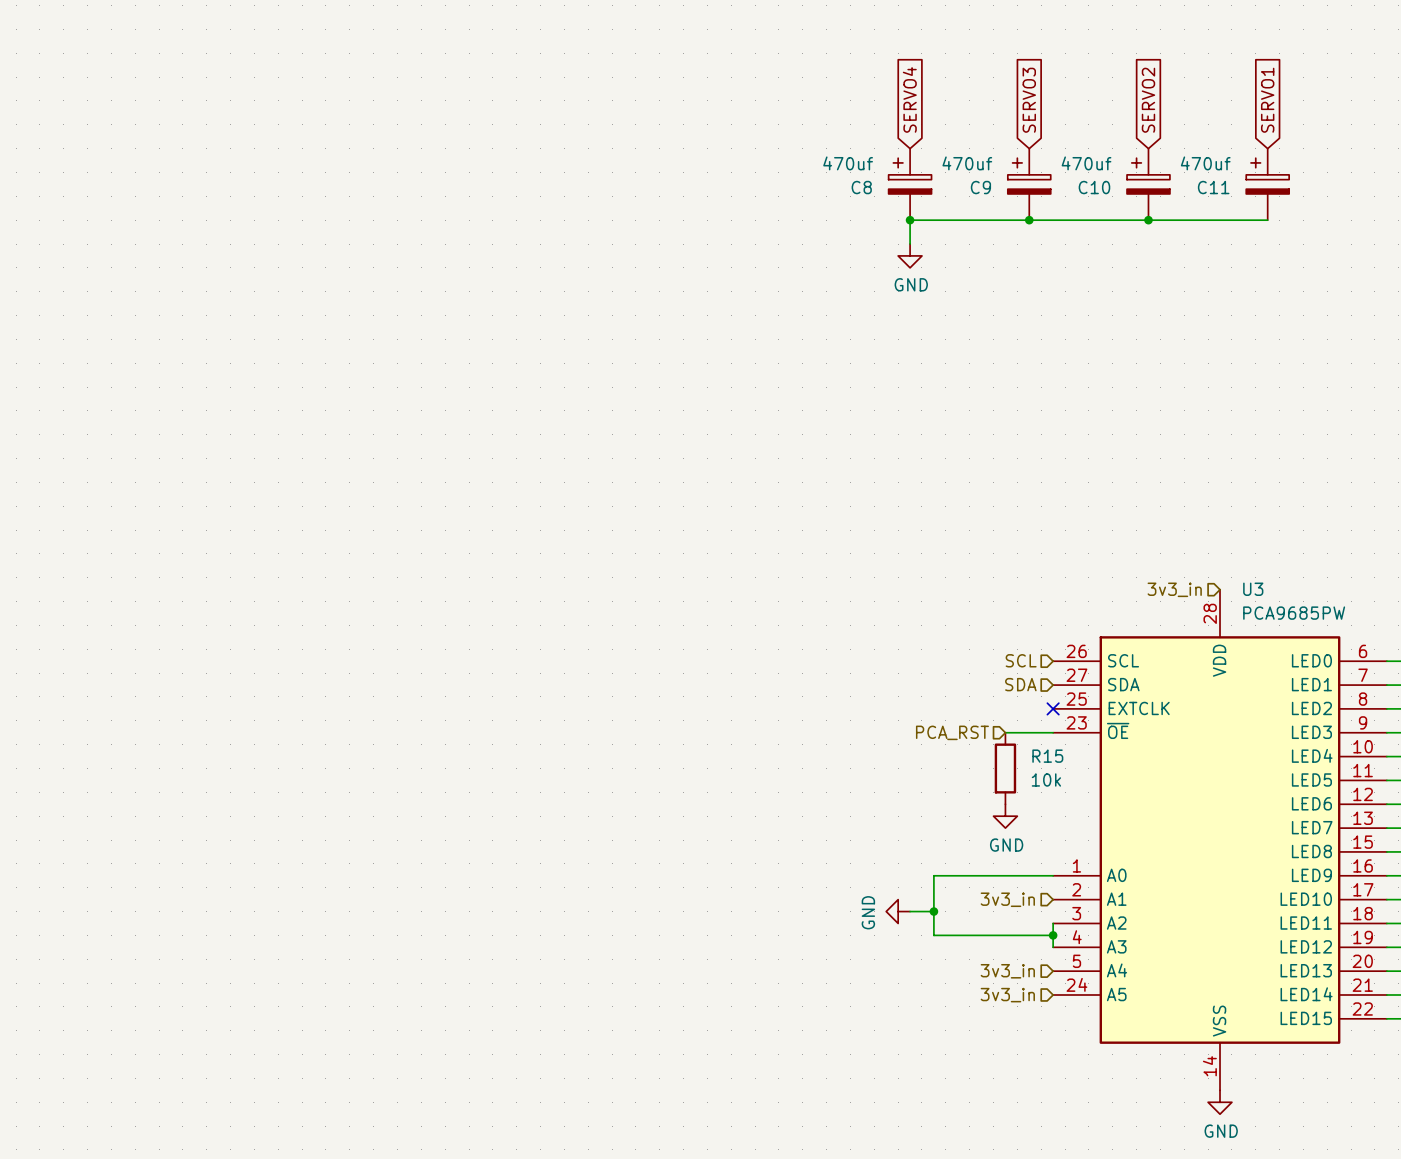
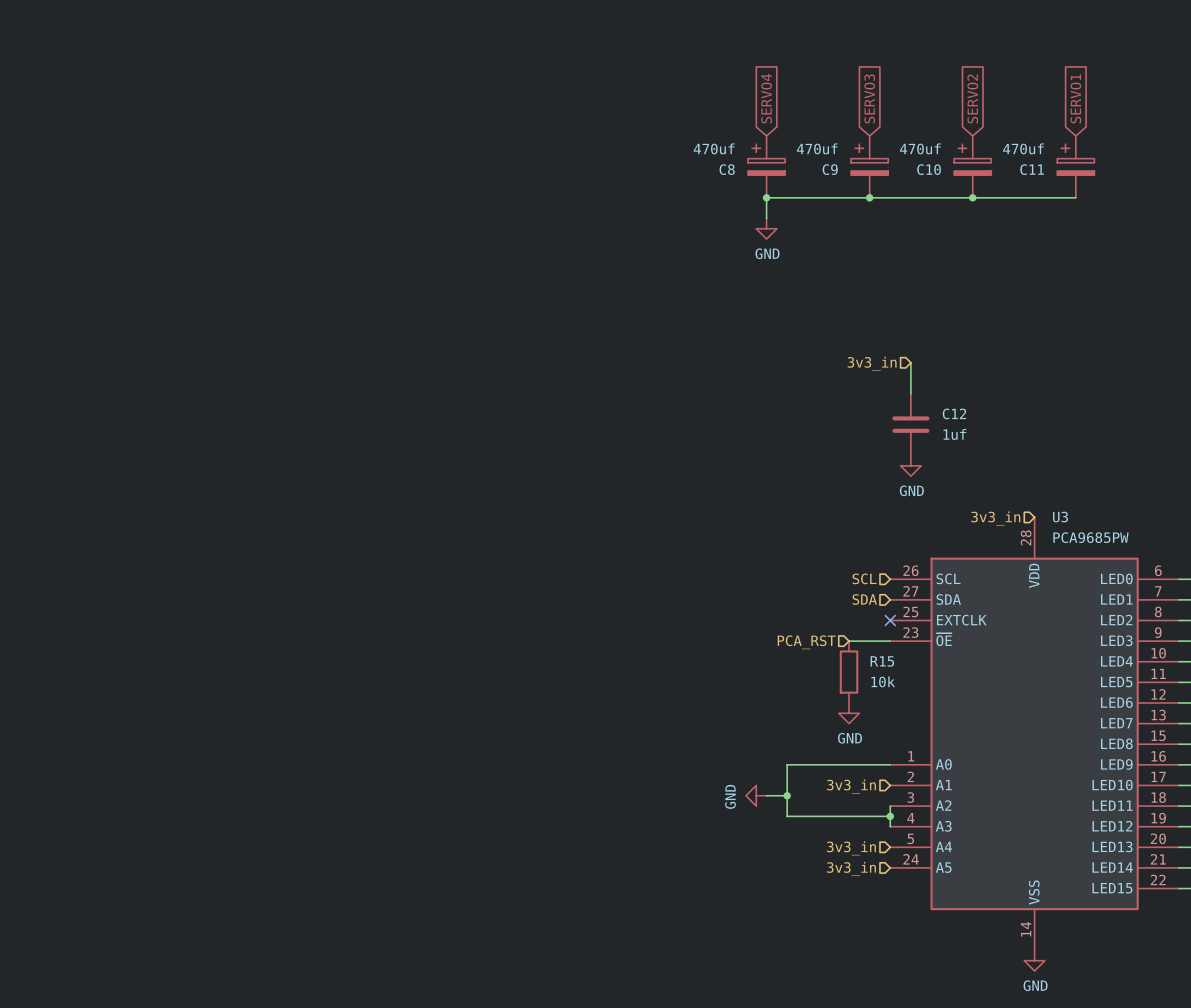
wire: none -> (910, 362) (910, 393)
hierarchical label: none -> 3v3_in (872, 363)
C12: none -> 1uf (910, 424)
power symbol: none -> GND (910, 465)

